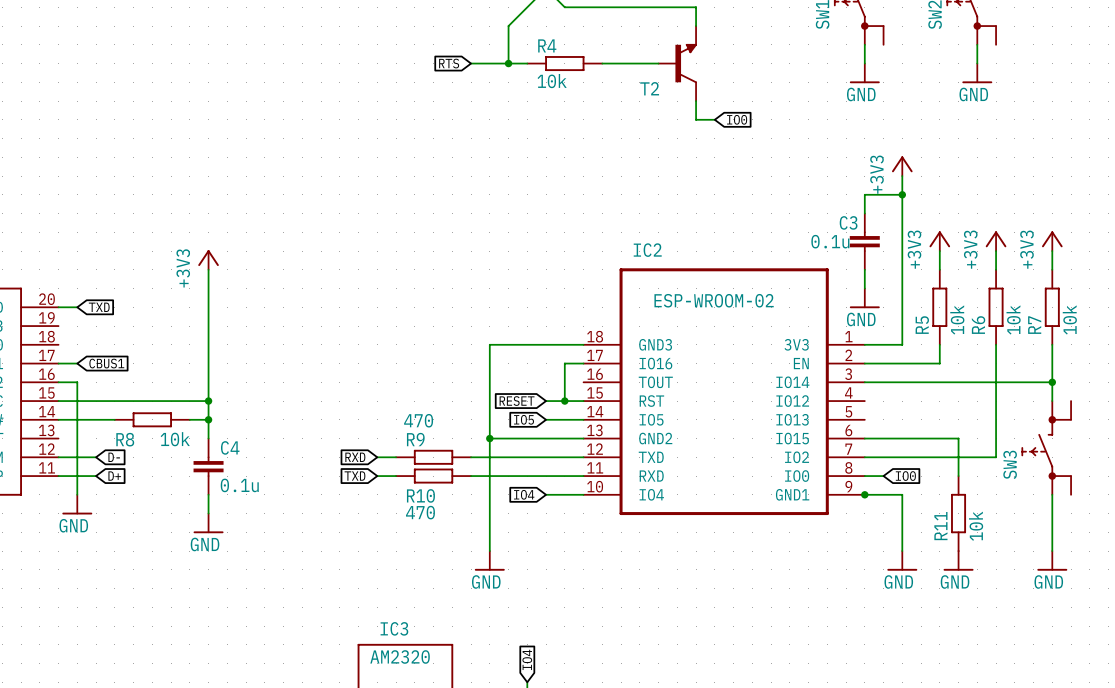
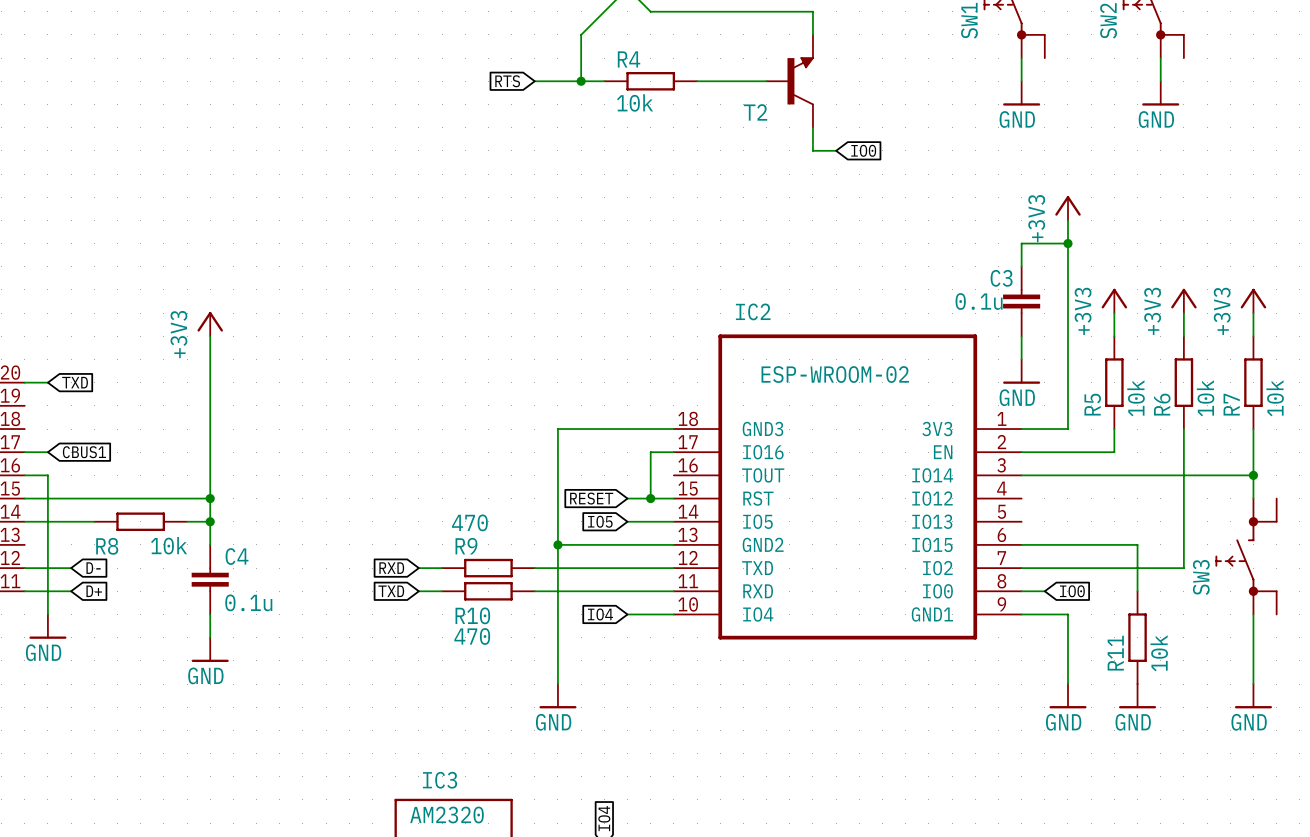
junction: (864, 494) -> none

